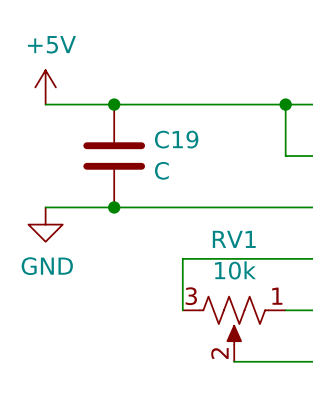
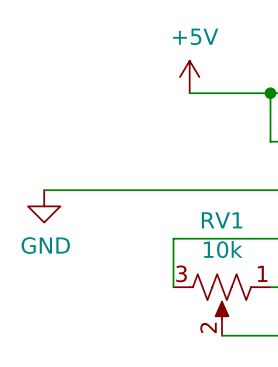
power symbol position: +5V (45, 87) -> +5V (189, 77)
wire: (45, 104) (199, 104) -> none
junction: (114, 104) -> none
C19: C (114, 156) -> none
junction: (114, 207) -> none

